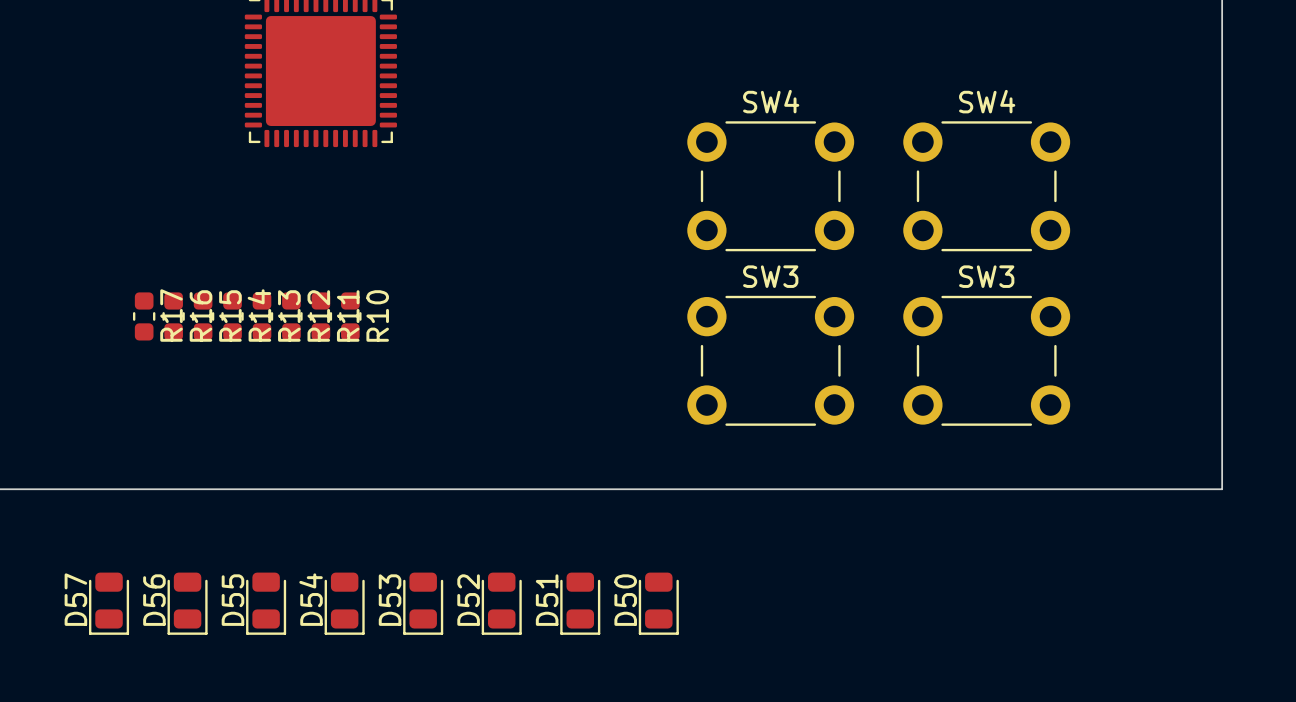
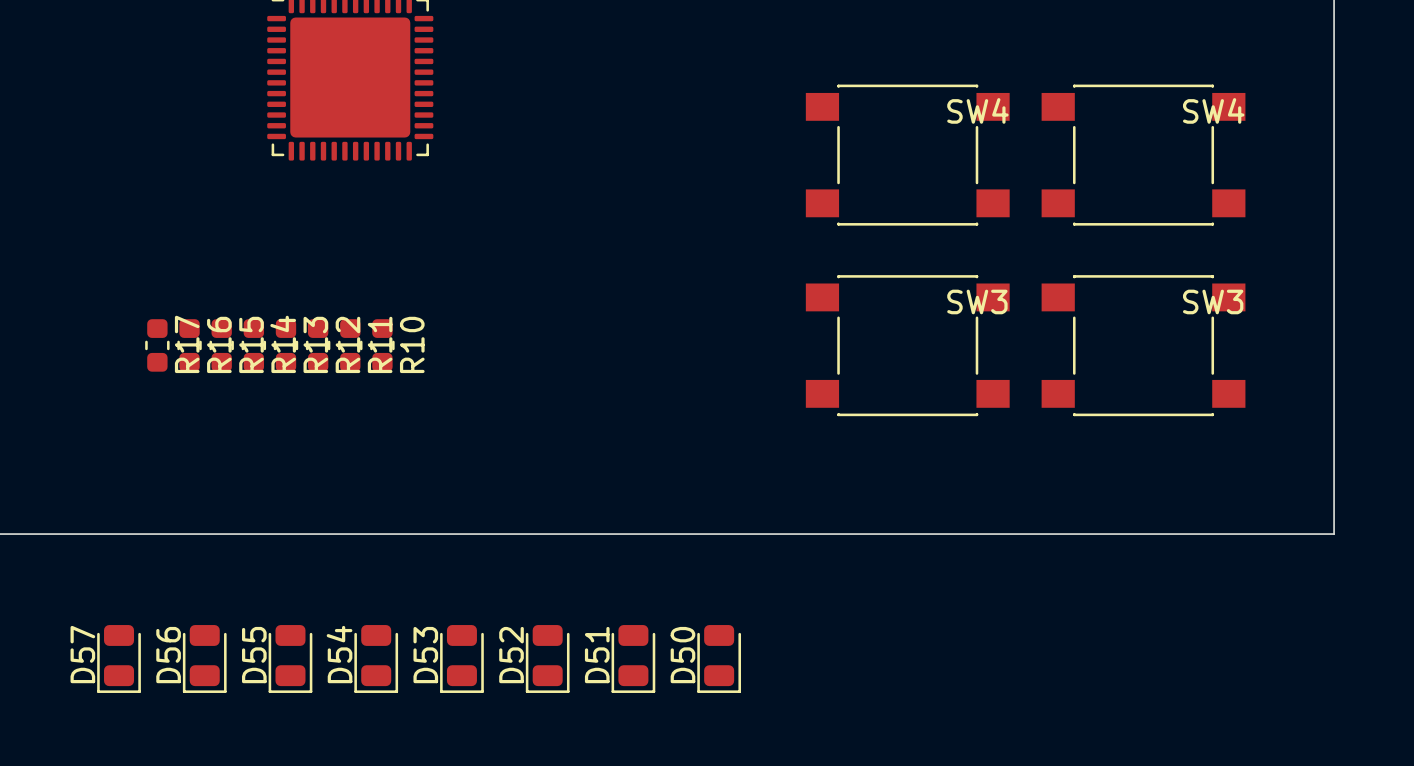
SW4: none -> (907, 155)
SW4: none -> (1143, 155)
SW4: (770, 186) -> none
SW4: (986, 186) -> none
SW3: none -> (907, 345)
SW3: none -> (1143, 345)
SW3: (770, 360) -> none
SW3: (986, 360) -> none

